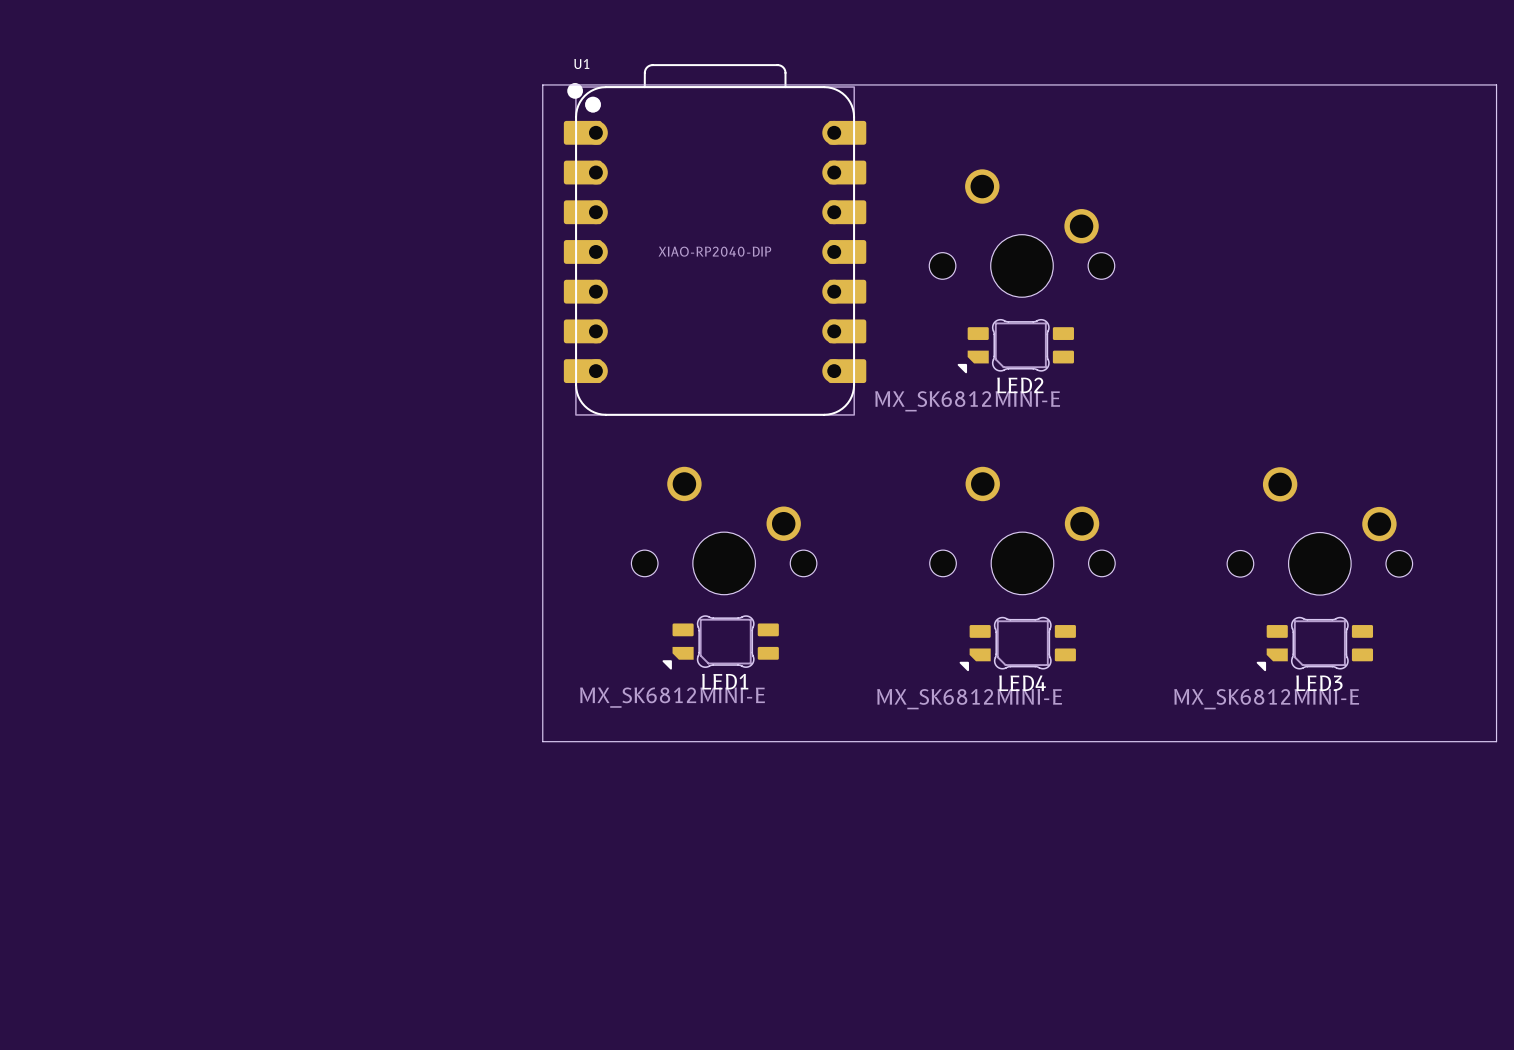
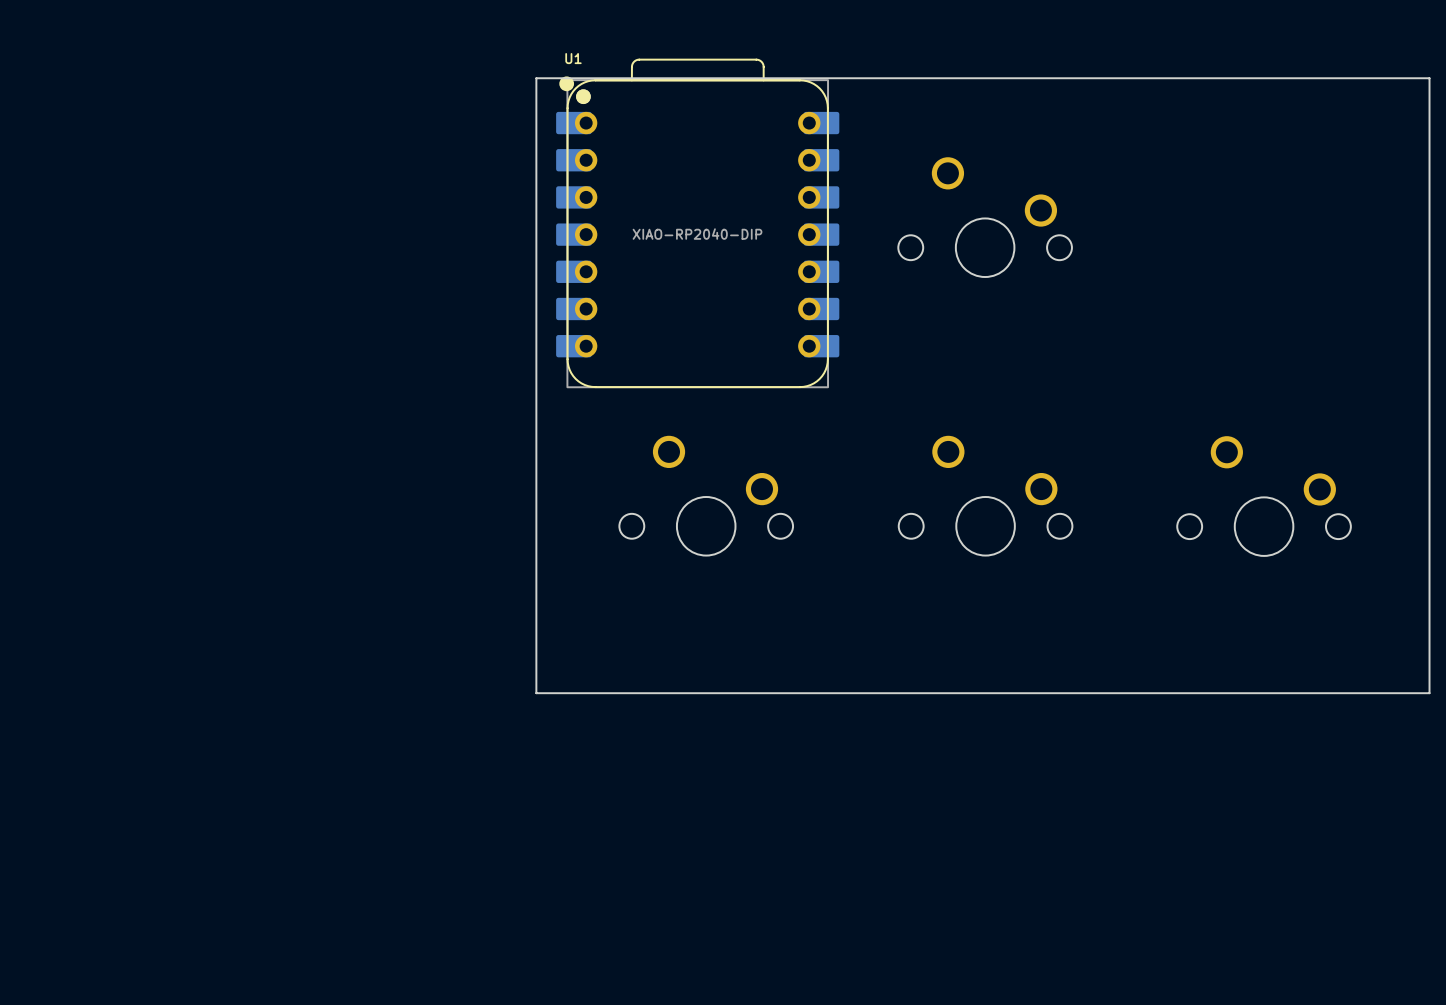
LED2: MX_SK6812MINI-E (1015, 346) -> none
LED1: MX_SK6812MINI-E (720, 642) -> none
LED4: MX_SK6812MINI-E (1017, 643) -> none
LED3: MX_SK6812MINI-E (1314, 643) -> none

